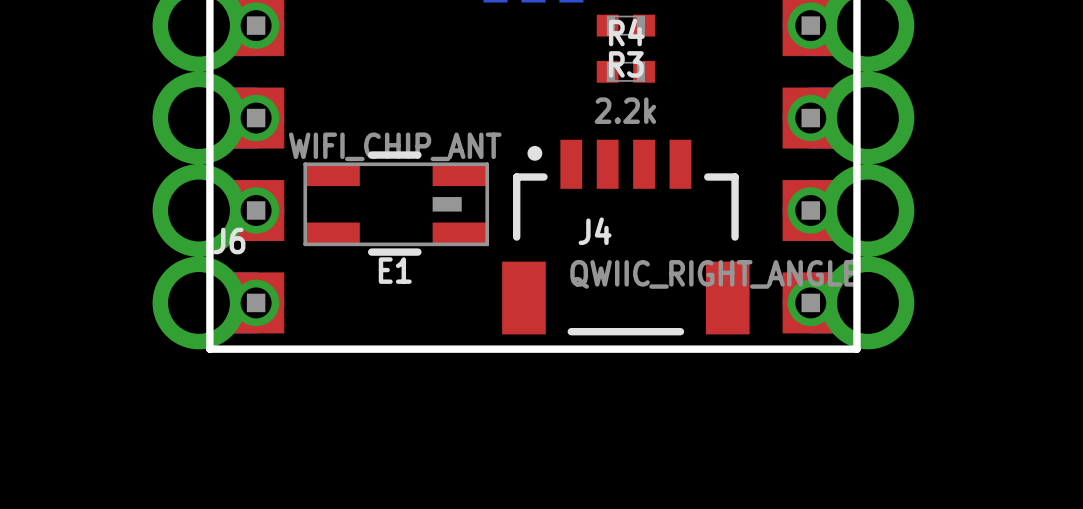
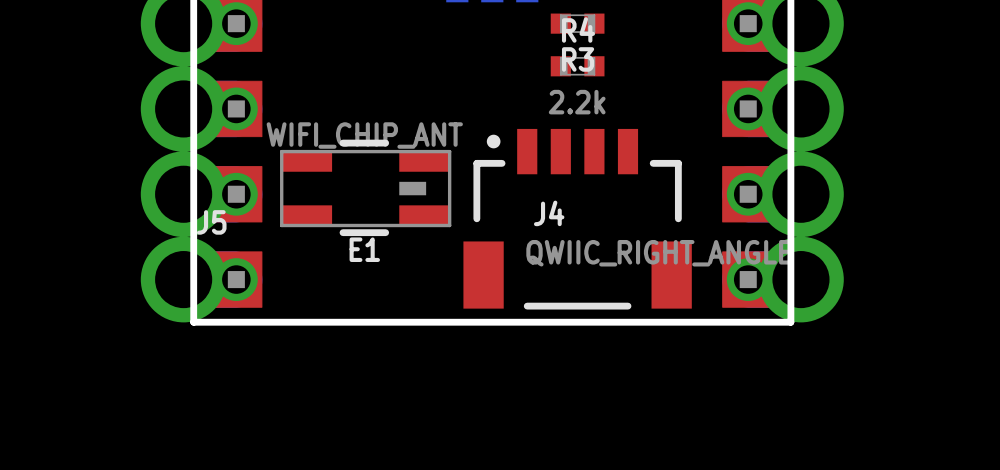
J6 name: J6 (229, 240) -> J5 (211, 222)

